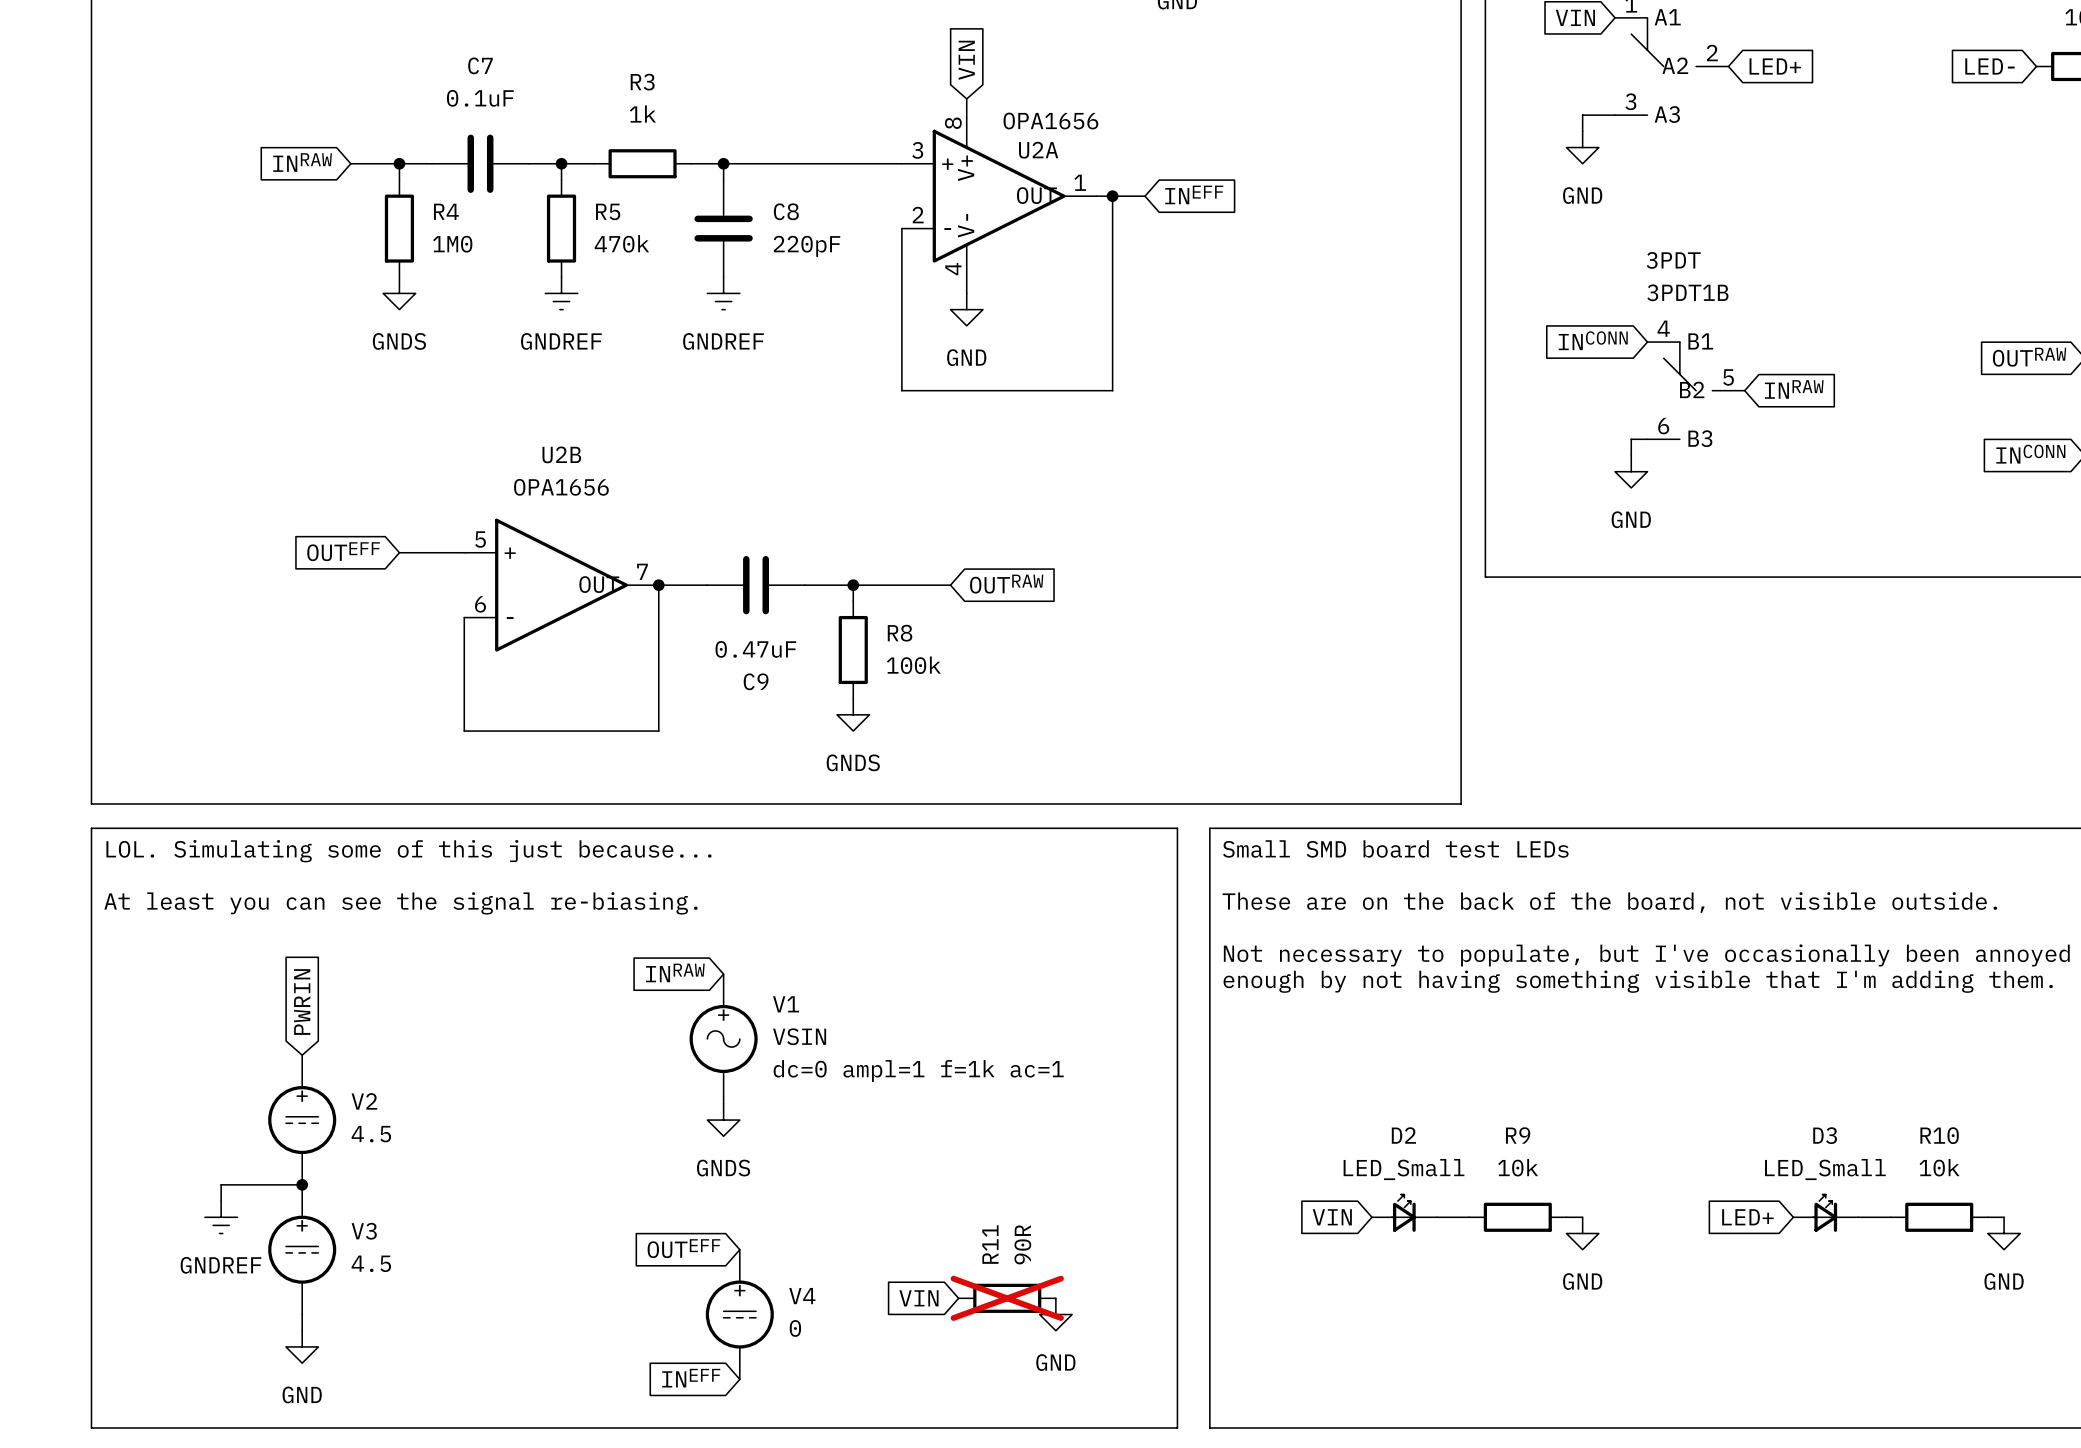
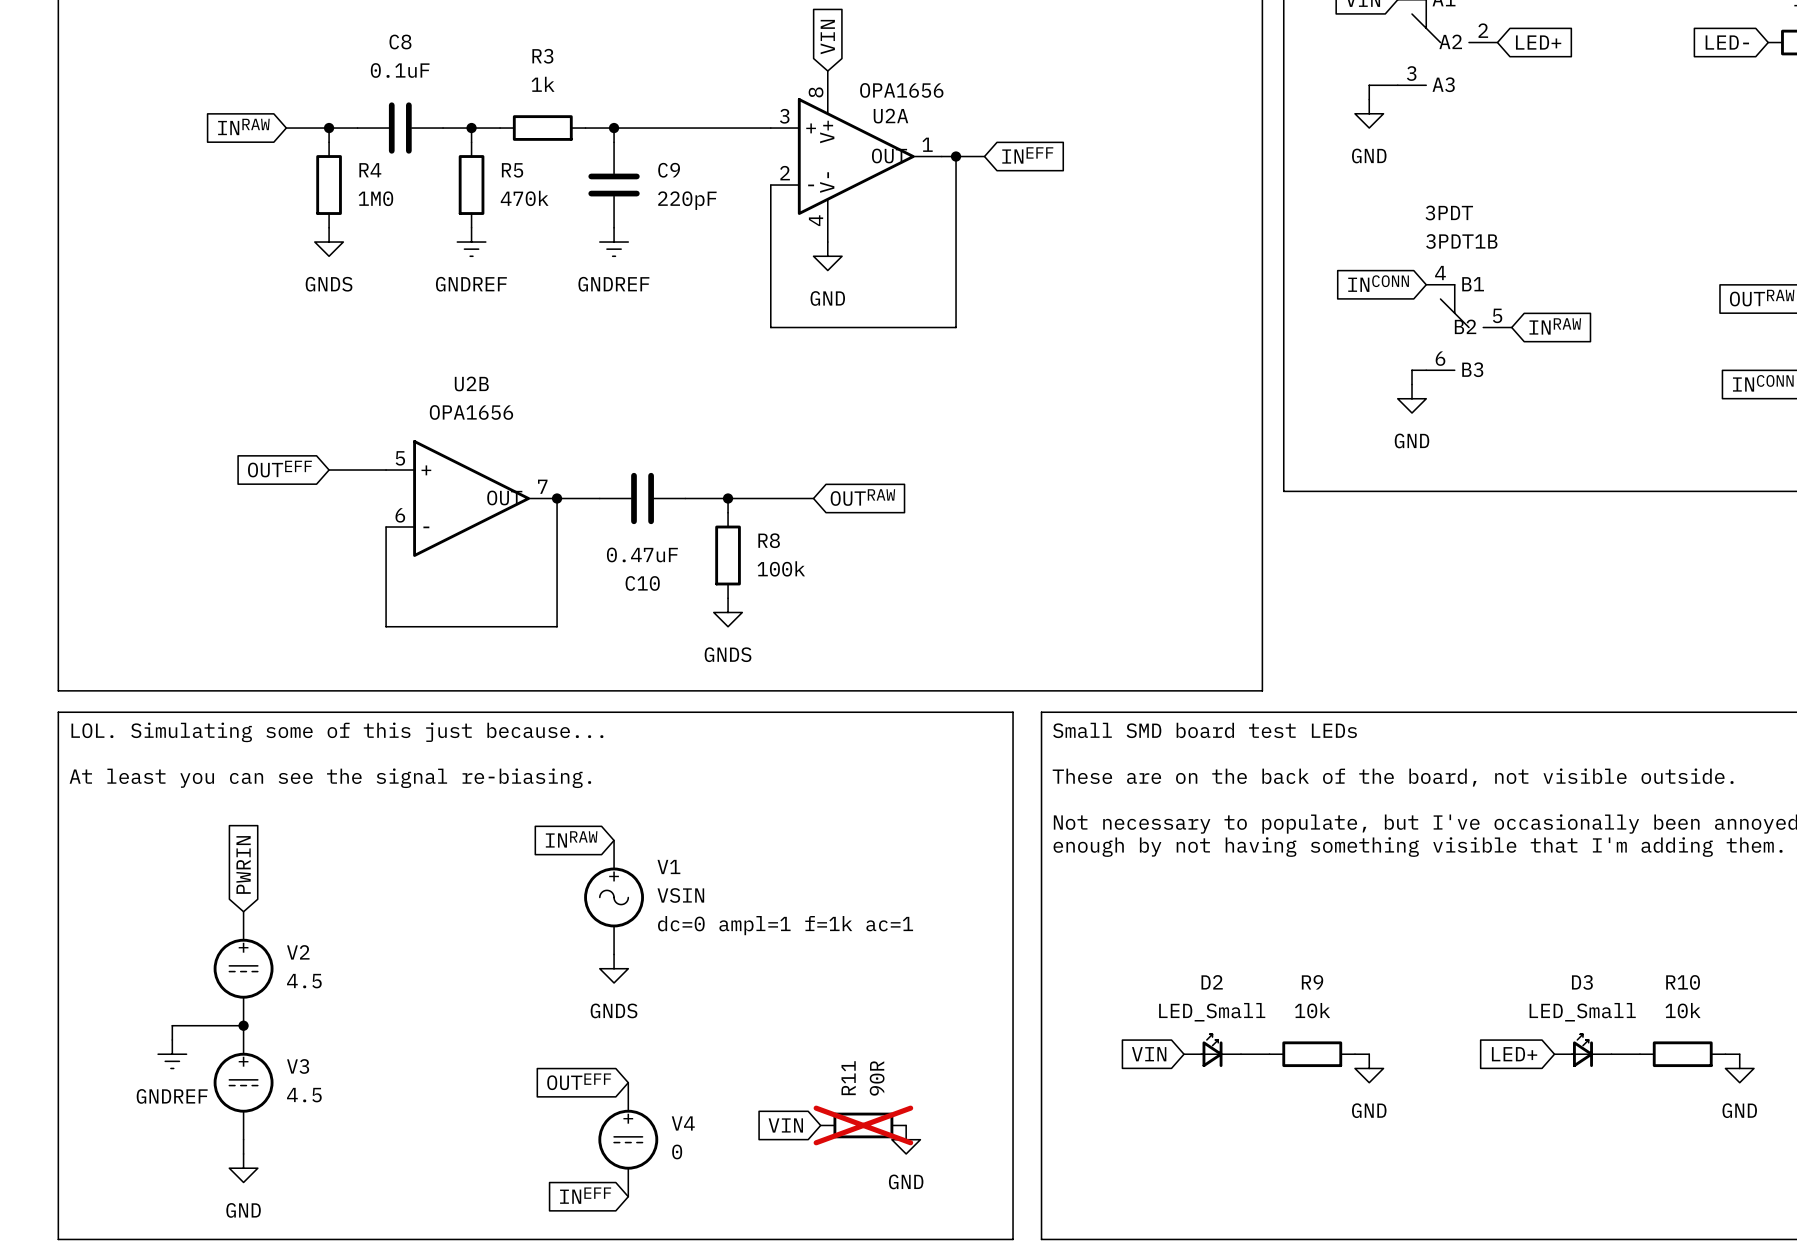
C7 name: C7 (480, 65) -> C8 (400, 42)
C8 name: C8 (786, 211) -> C9 (669, 170)
C9 name: C9 (756, 681) -> C10 (642, 583)

